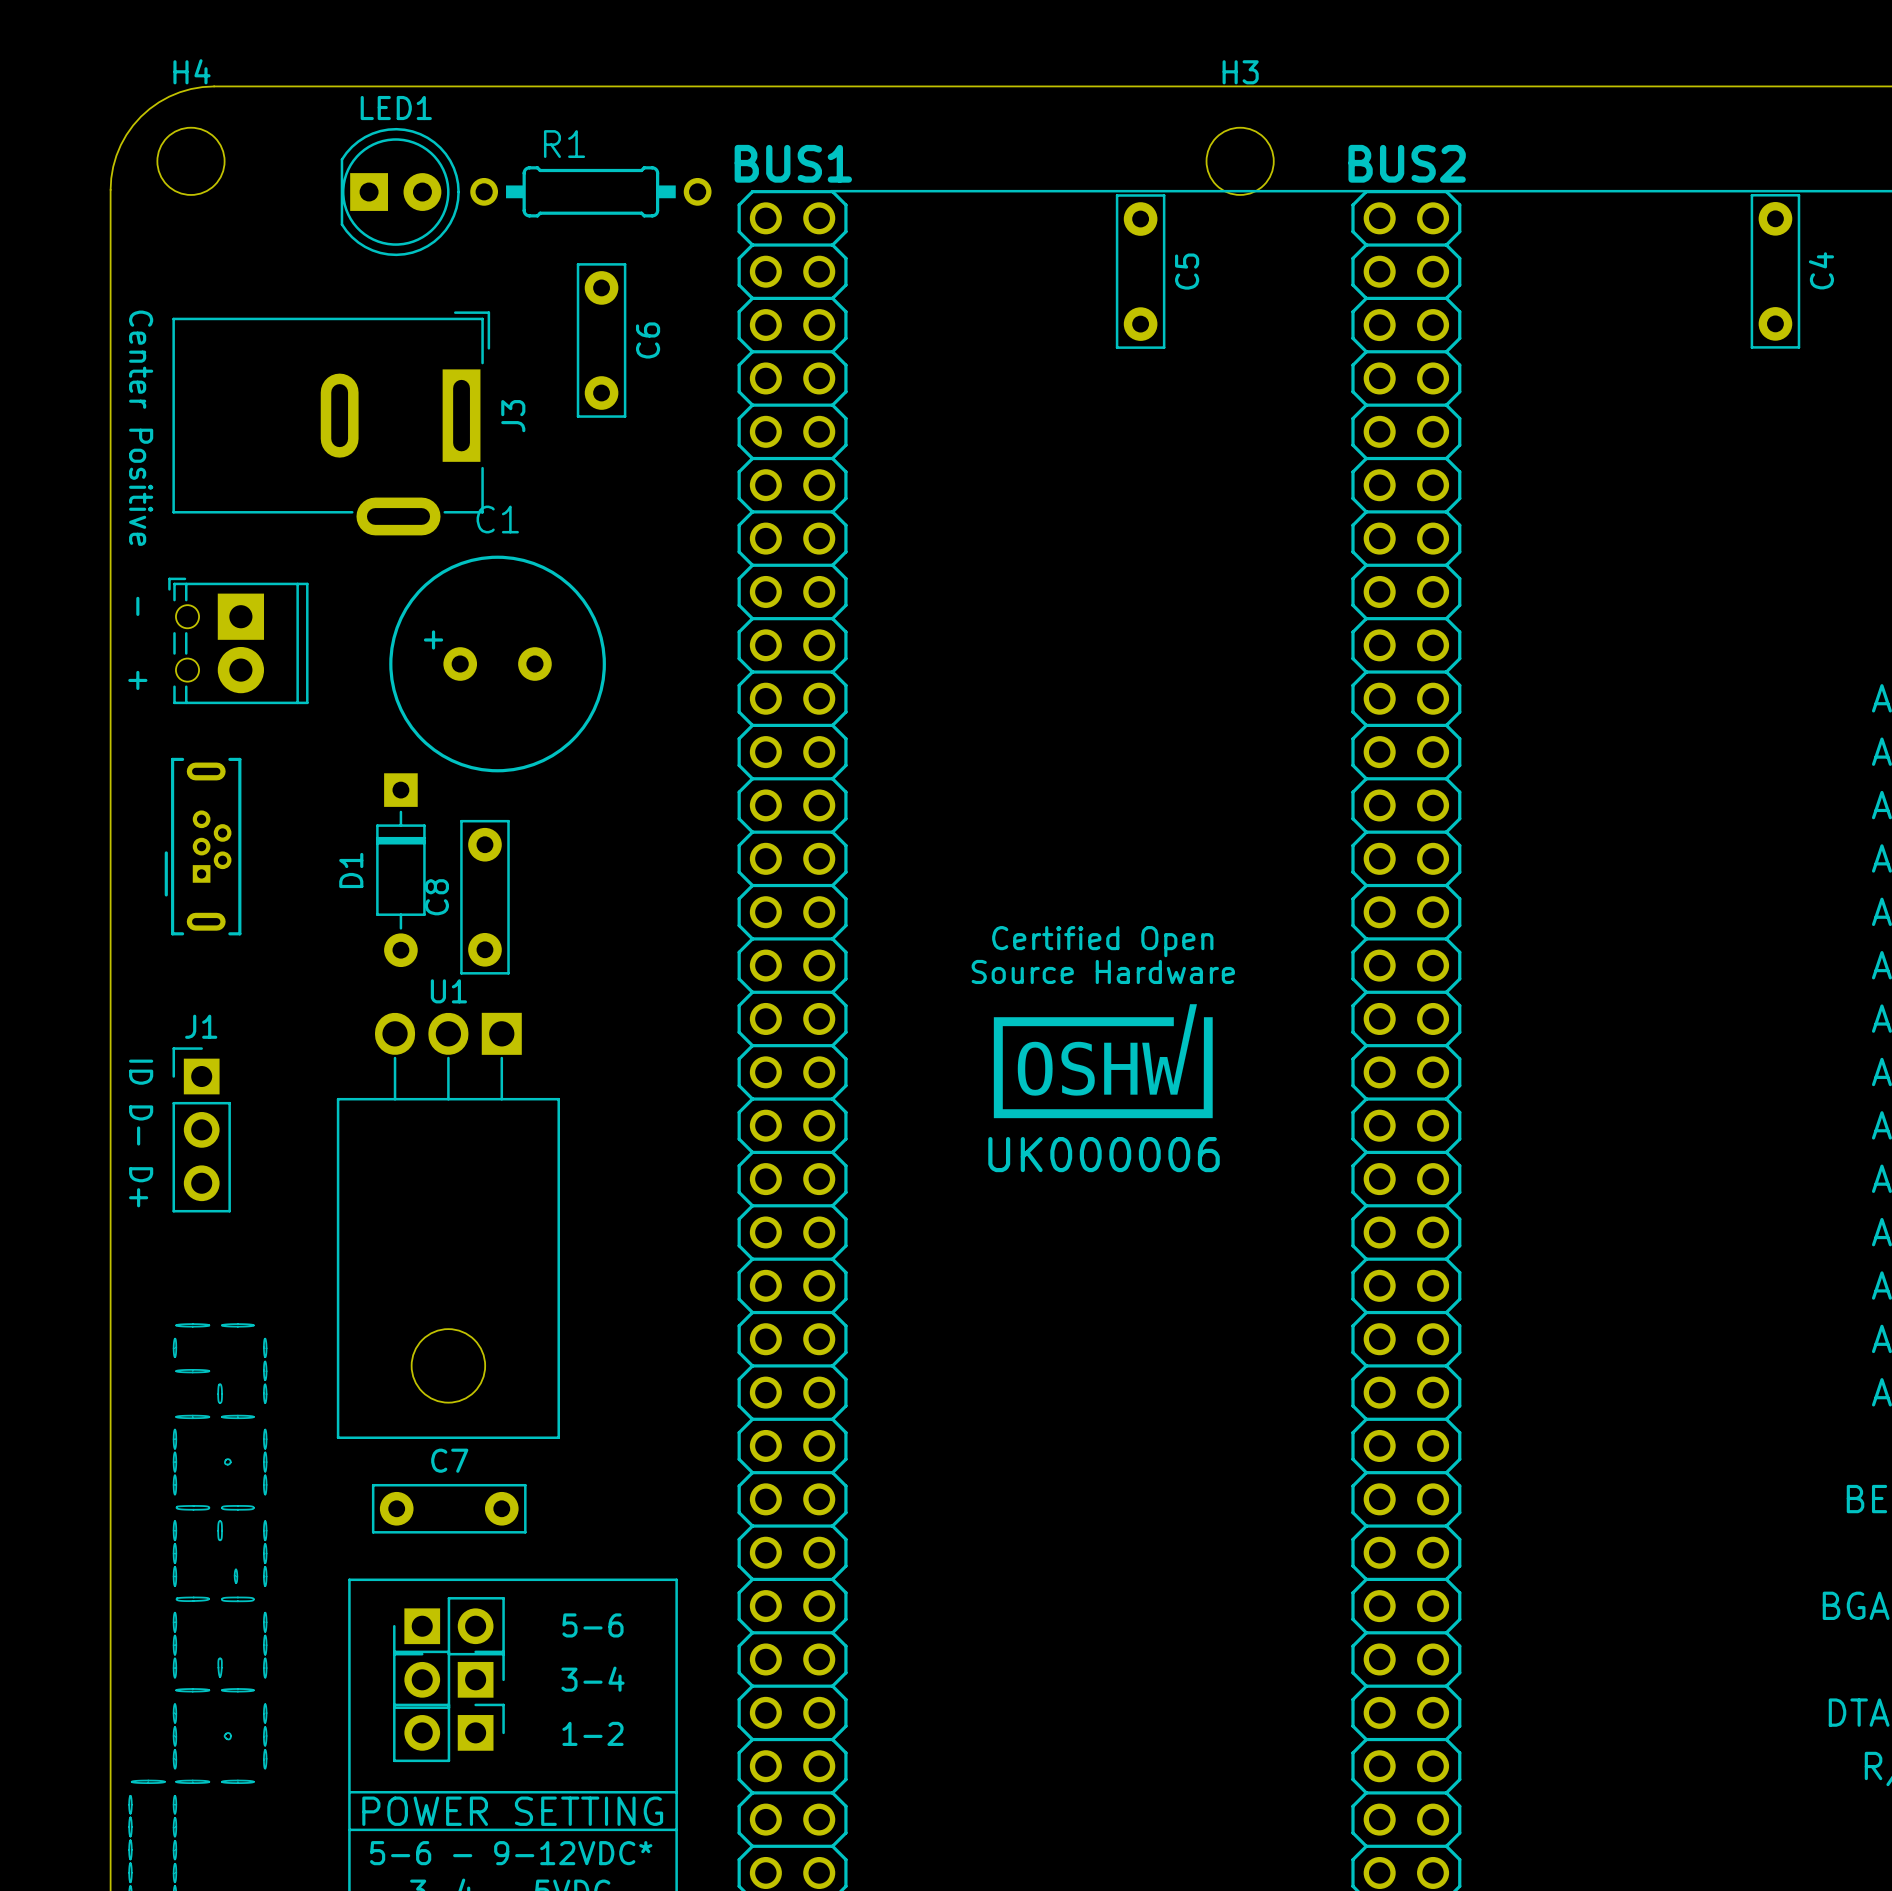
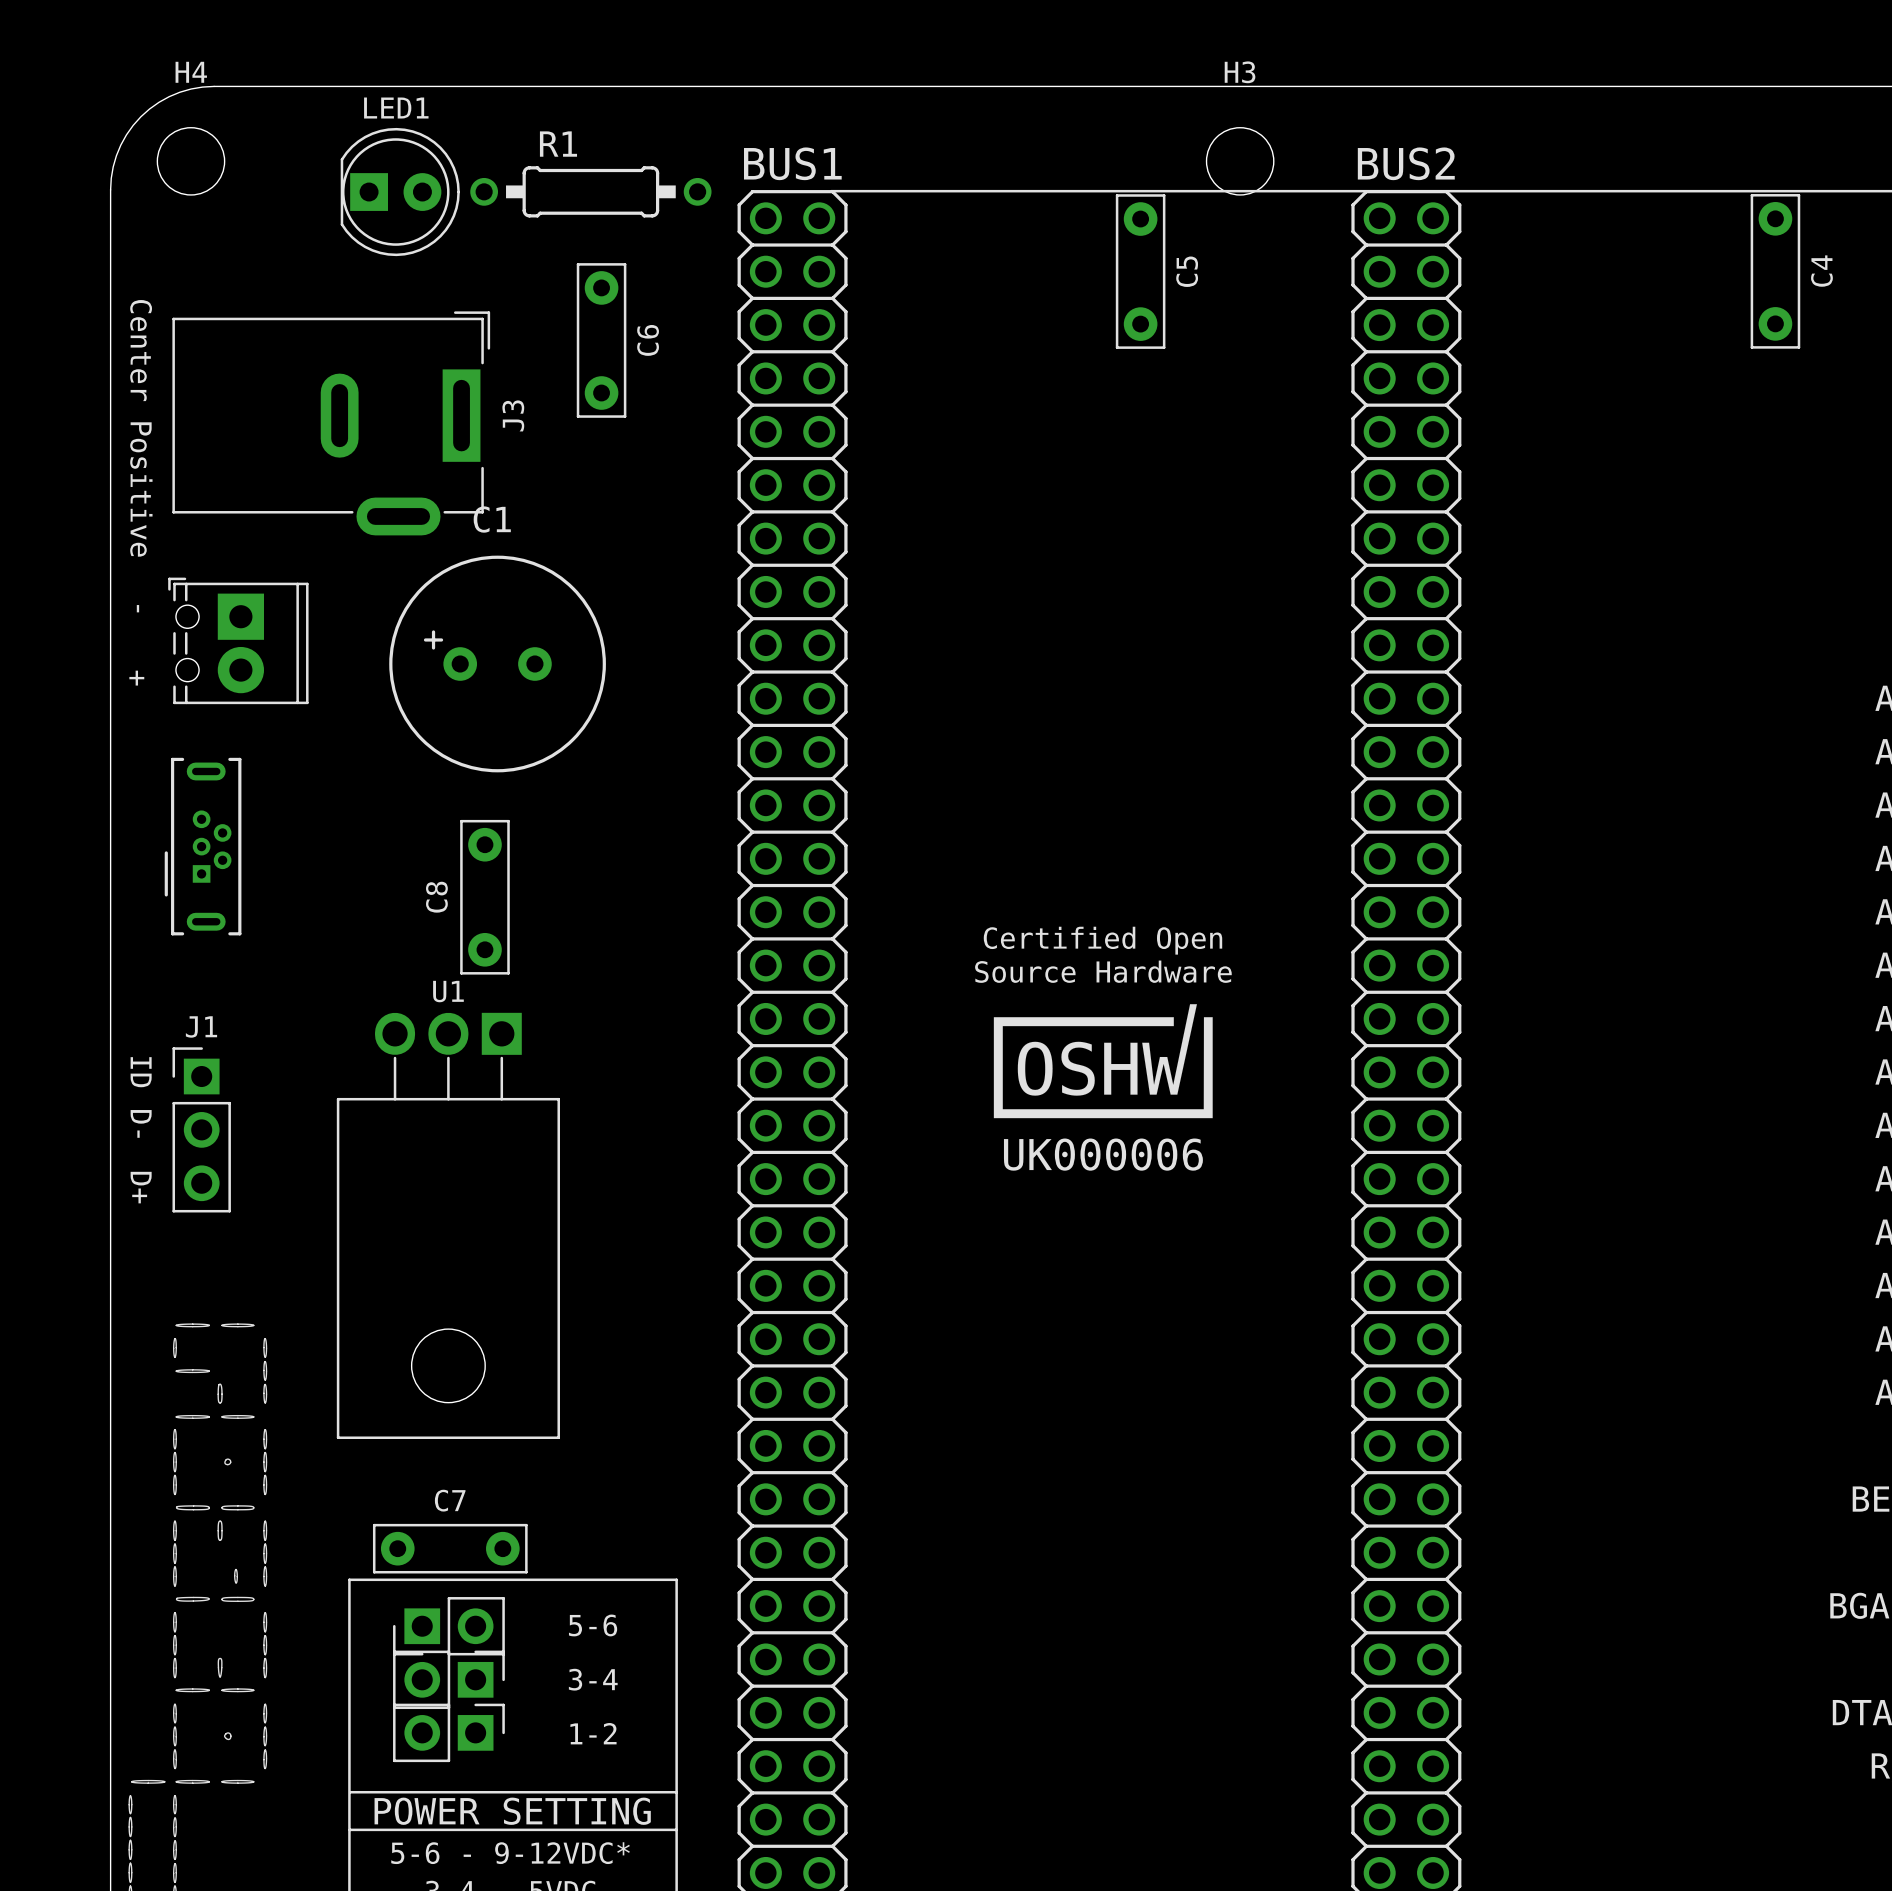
D1: (400, 870) -> none
C7 position: (449, 1508) -> (450, 1548)

